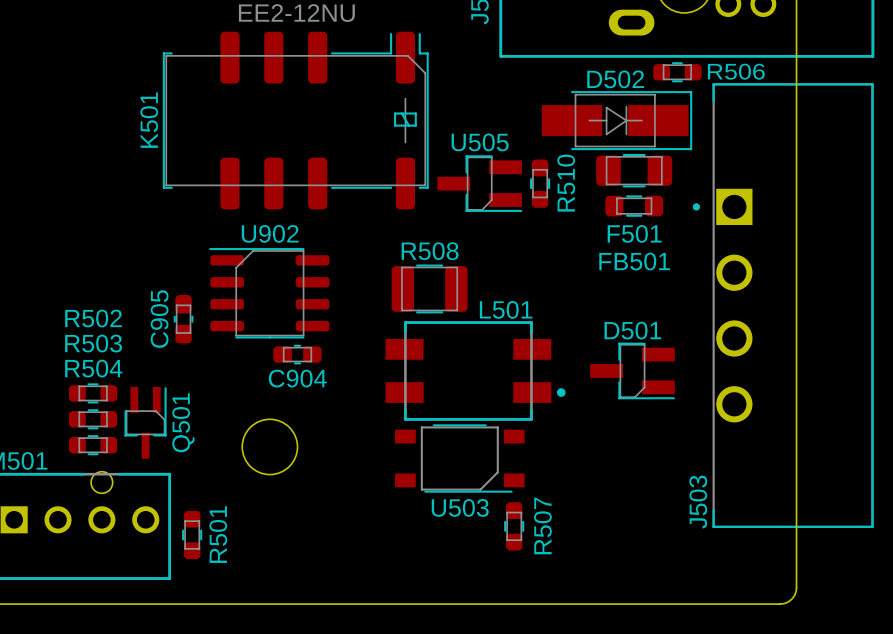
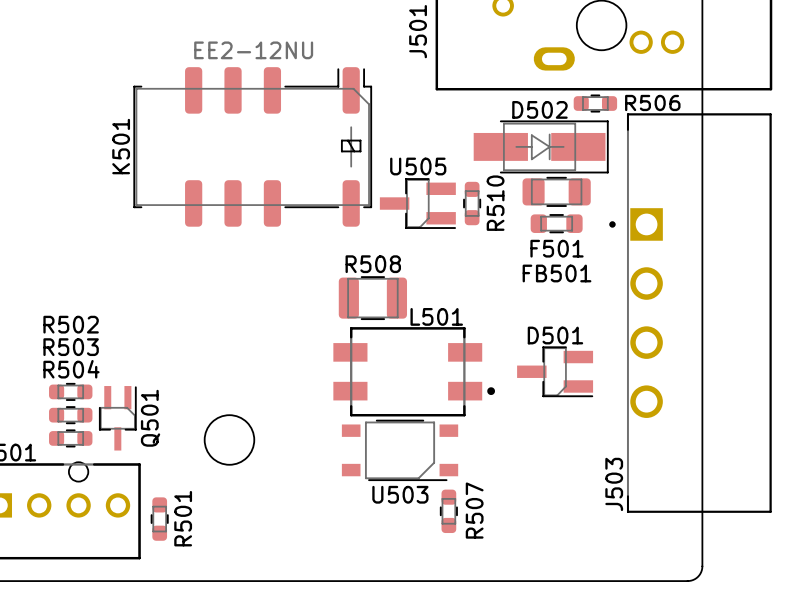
U902: (269, 293) -> none
C905: (183, 319) -> none
C904: (297, 354) -> none

